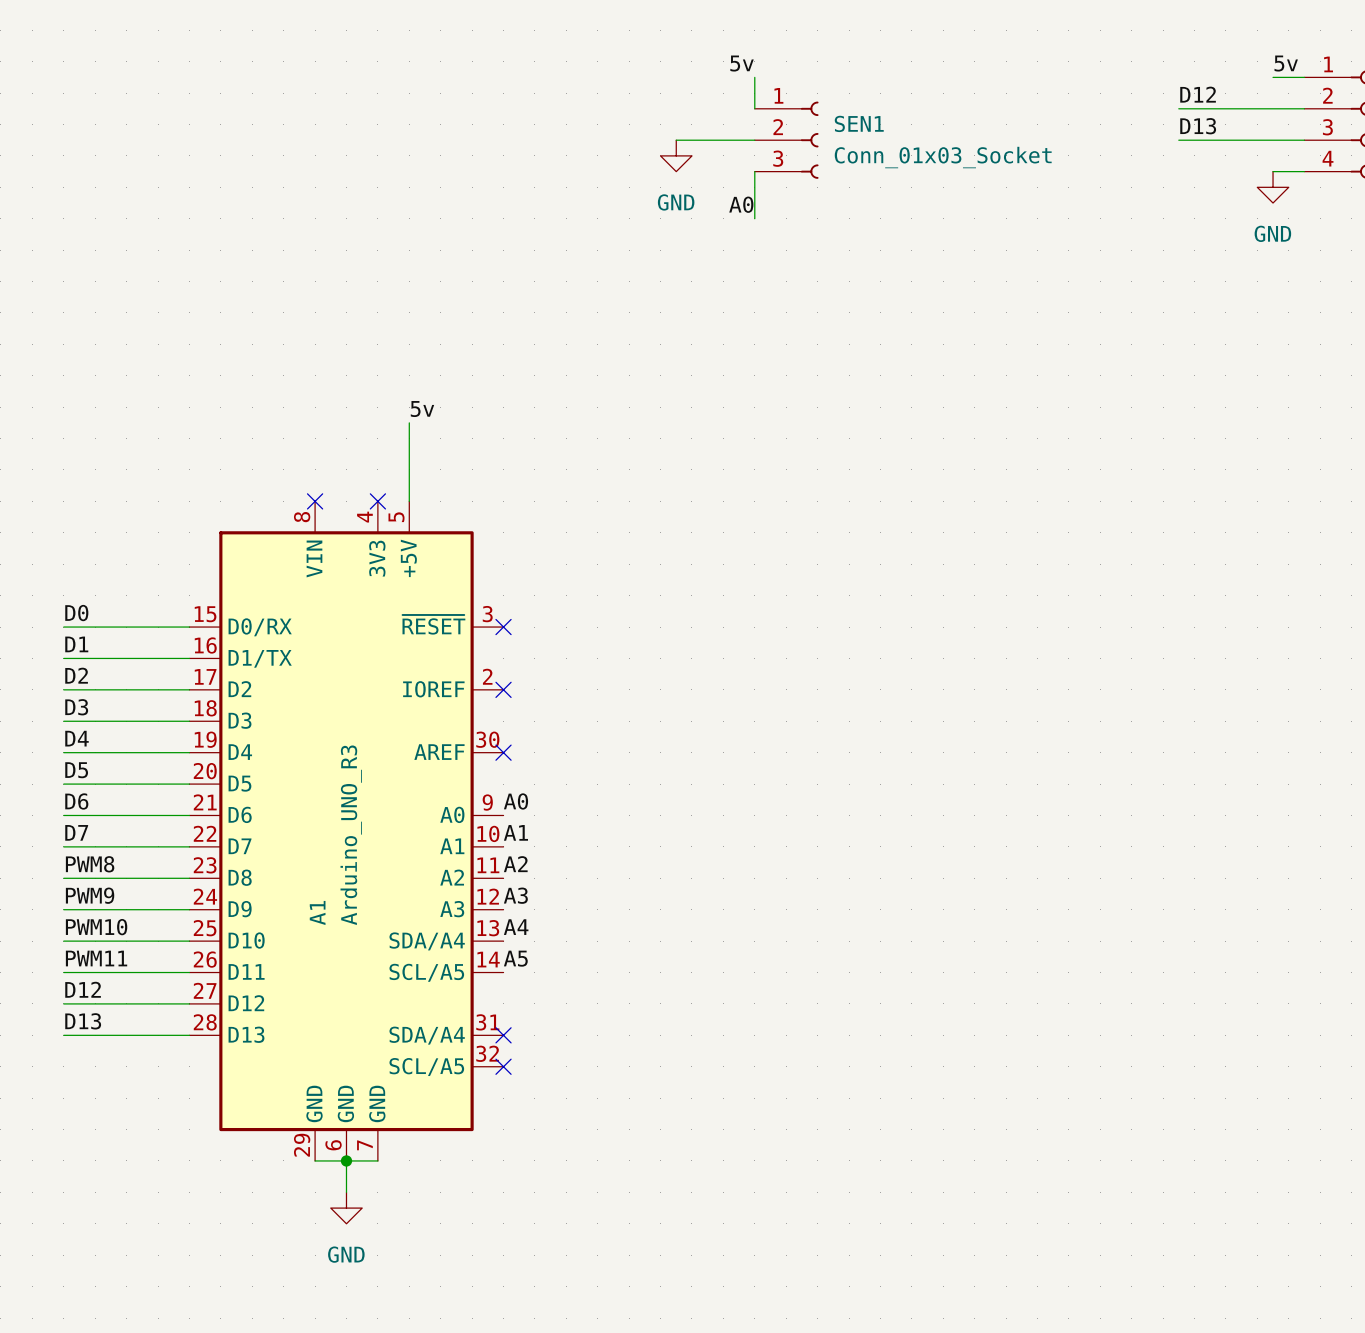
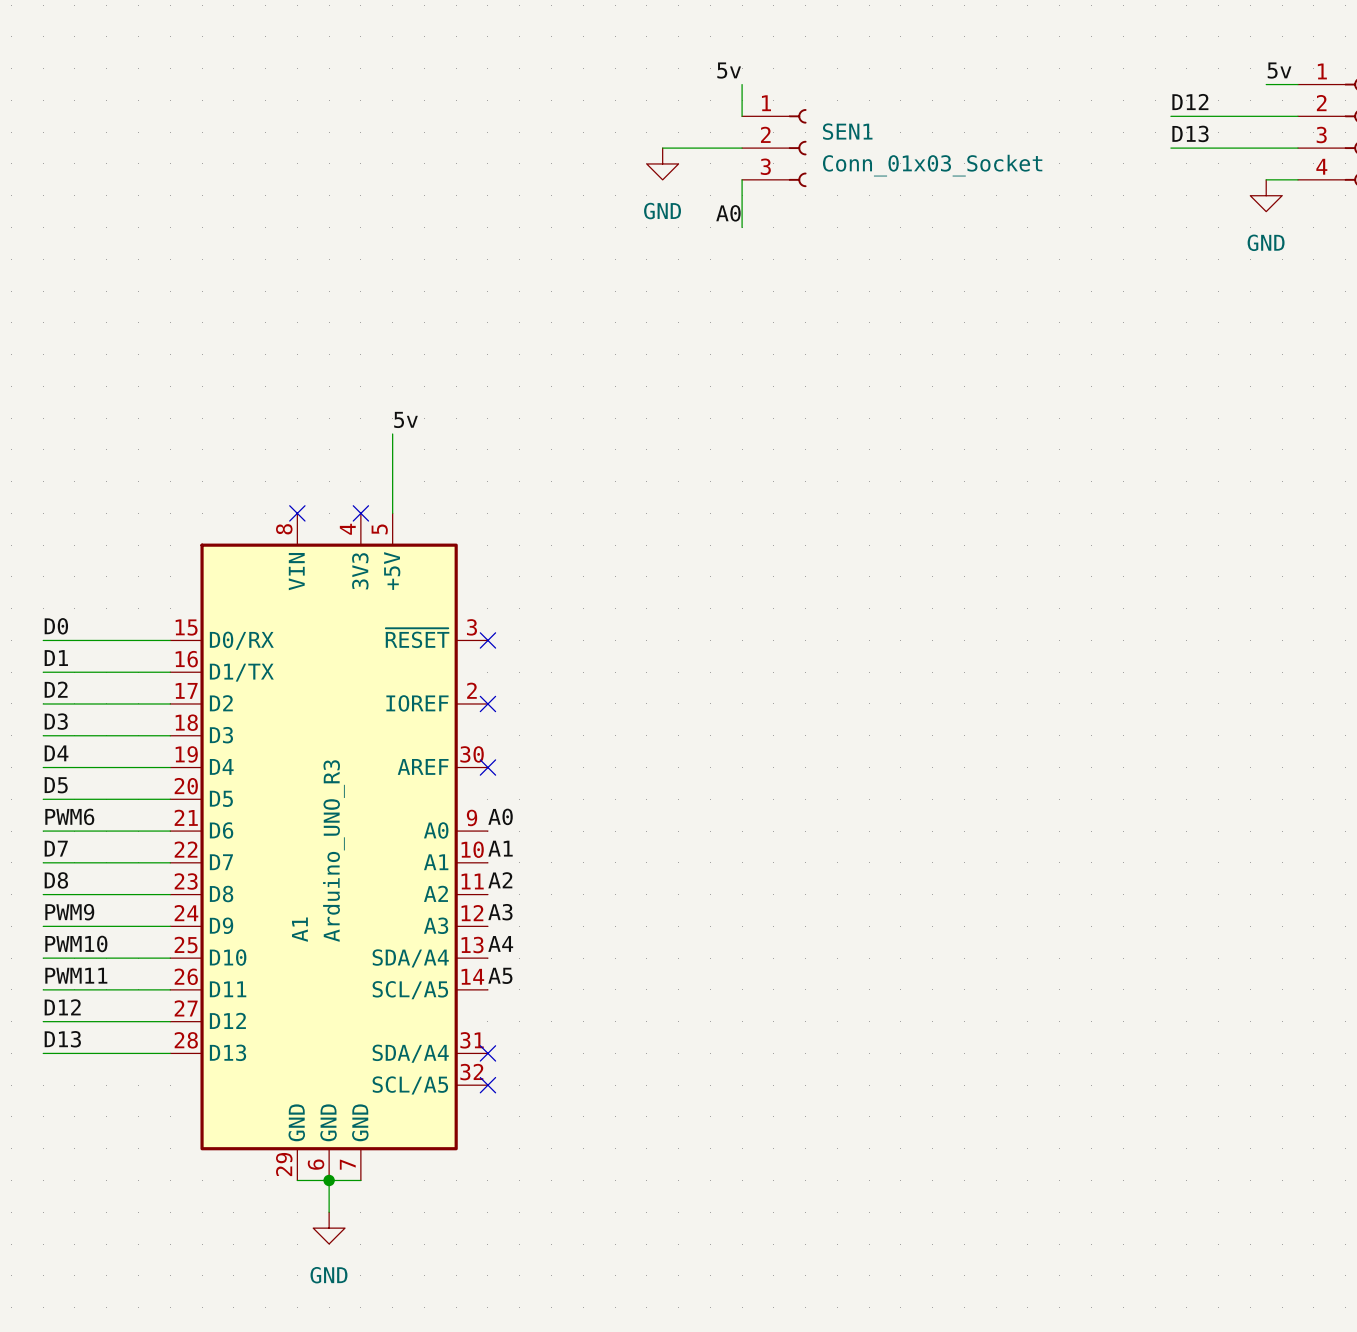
label: D6 (76, 801) -> PWM6 (69, 816)
label: PWM8 (90, 864) -> D8 (56, 880)

